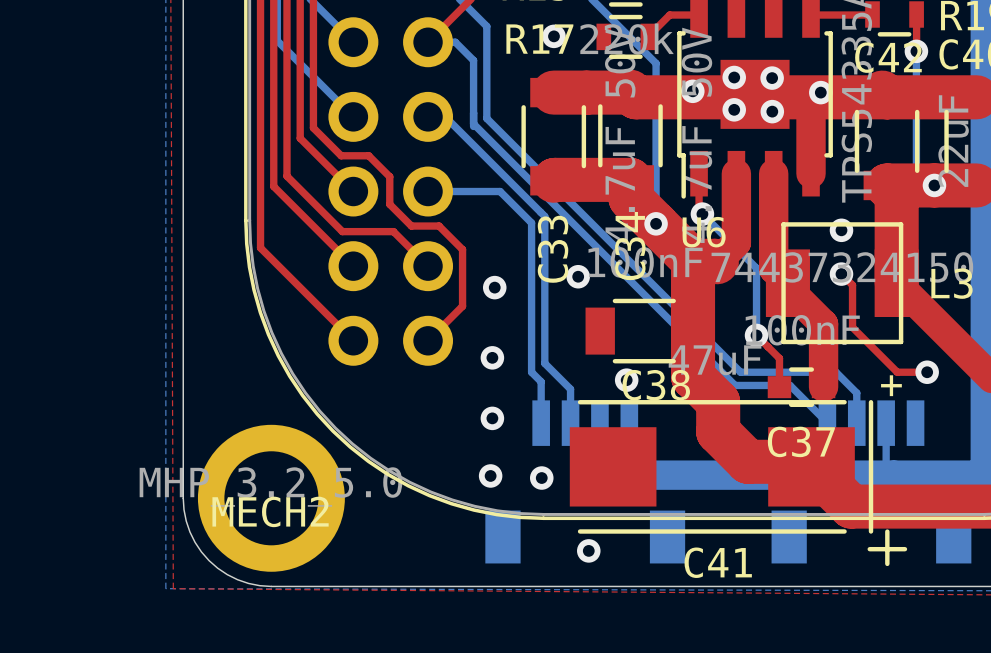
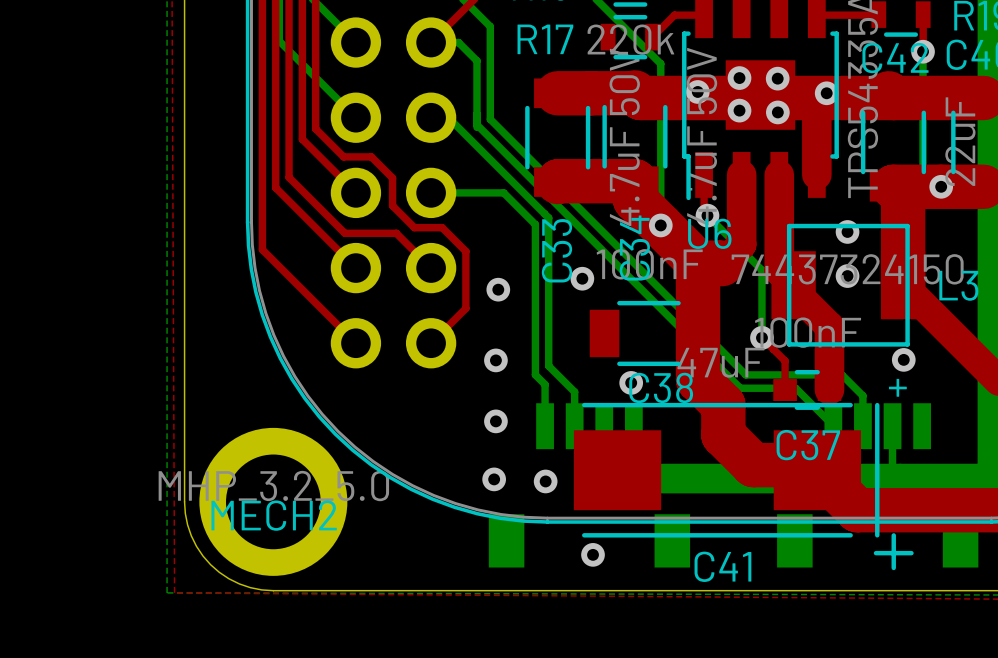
via: (553, 36) -> none
top track: (841, 274) (852, 285) (852, 327) (897, 372) (927, 372) -> none
via position: (927, 372) -> (903, 359)

